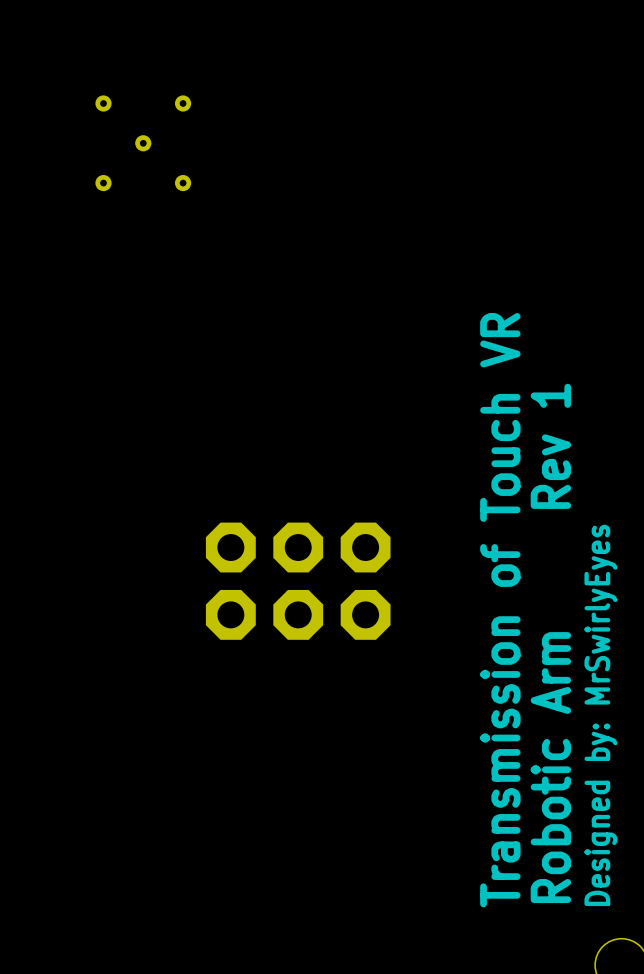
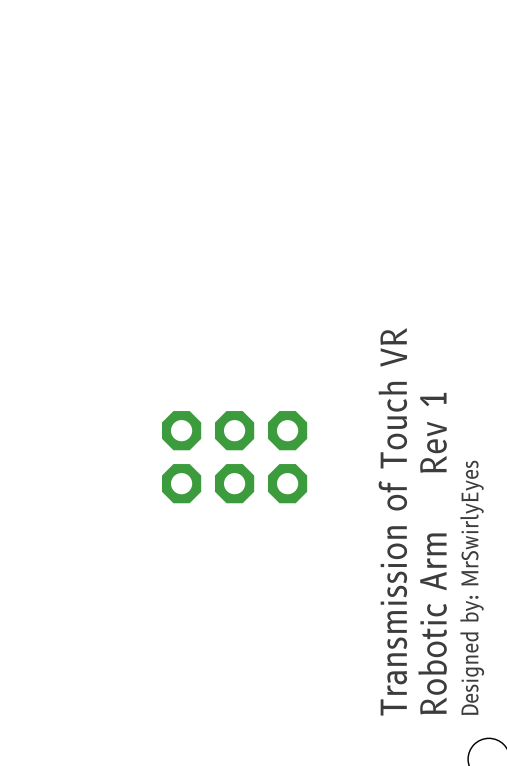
part: (143, 143) -> none

